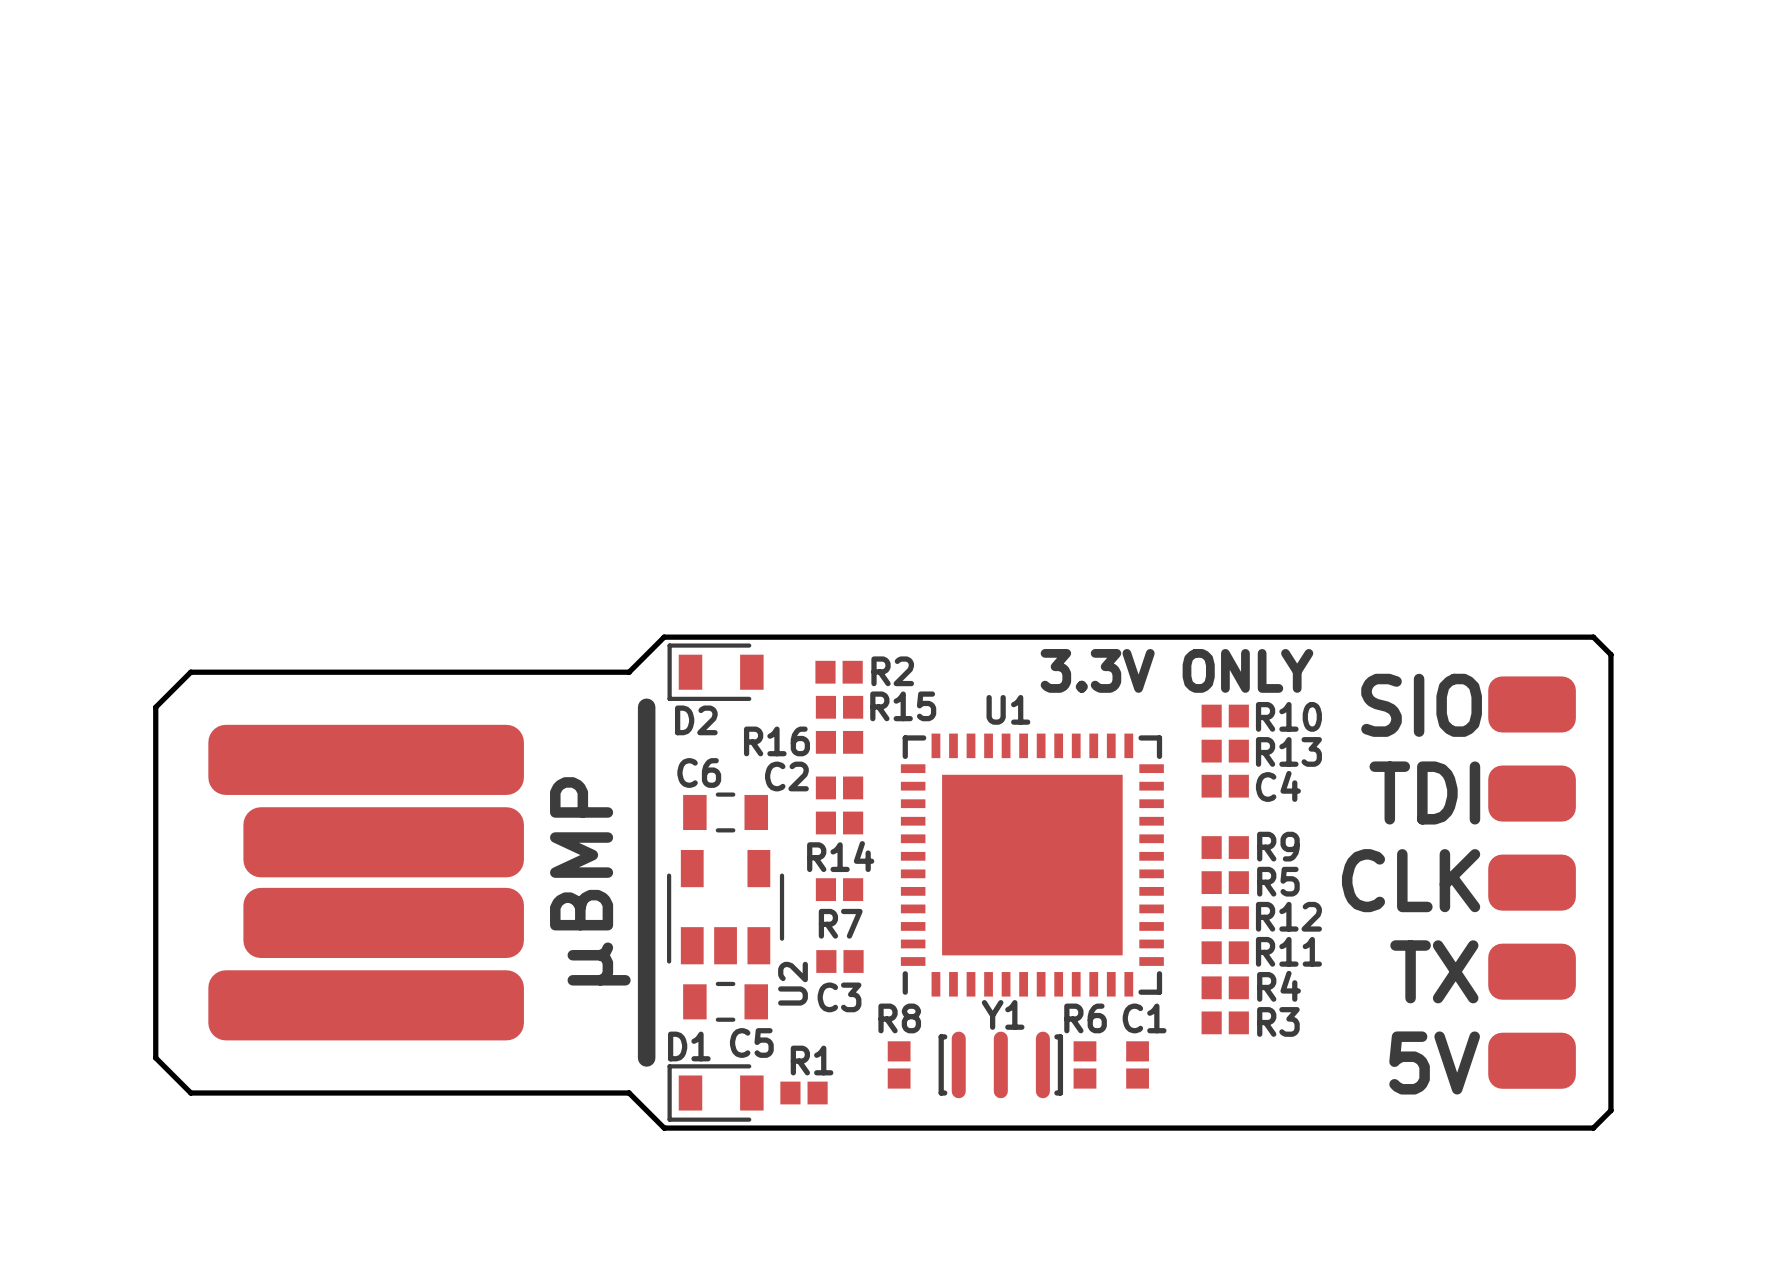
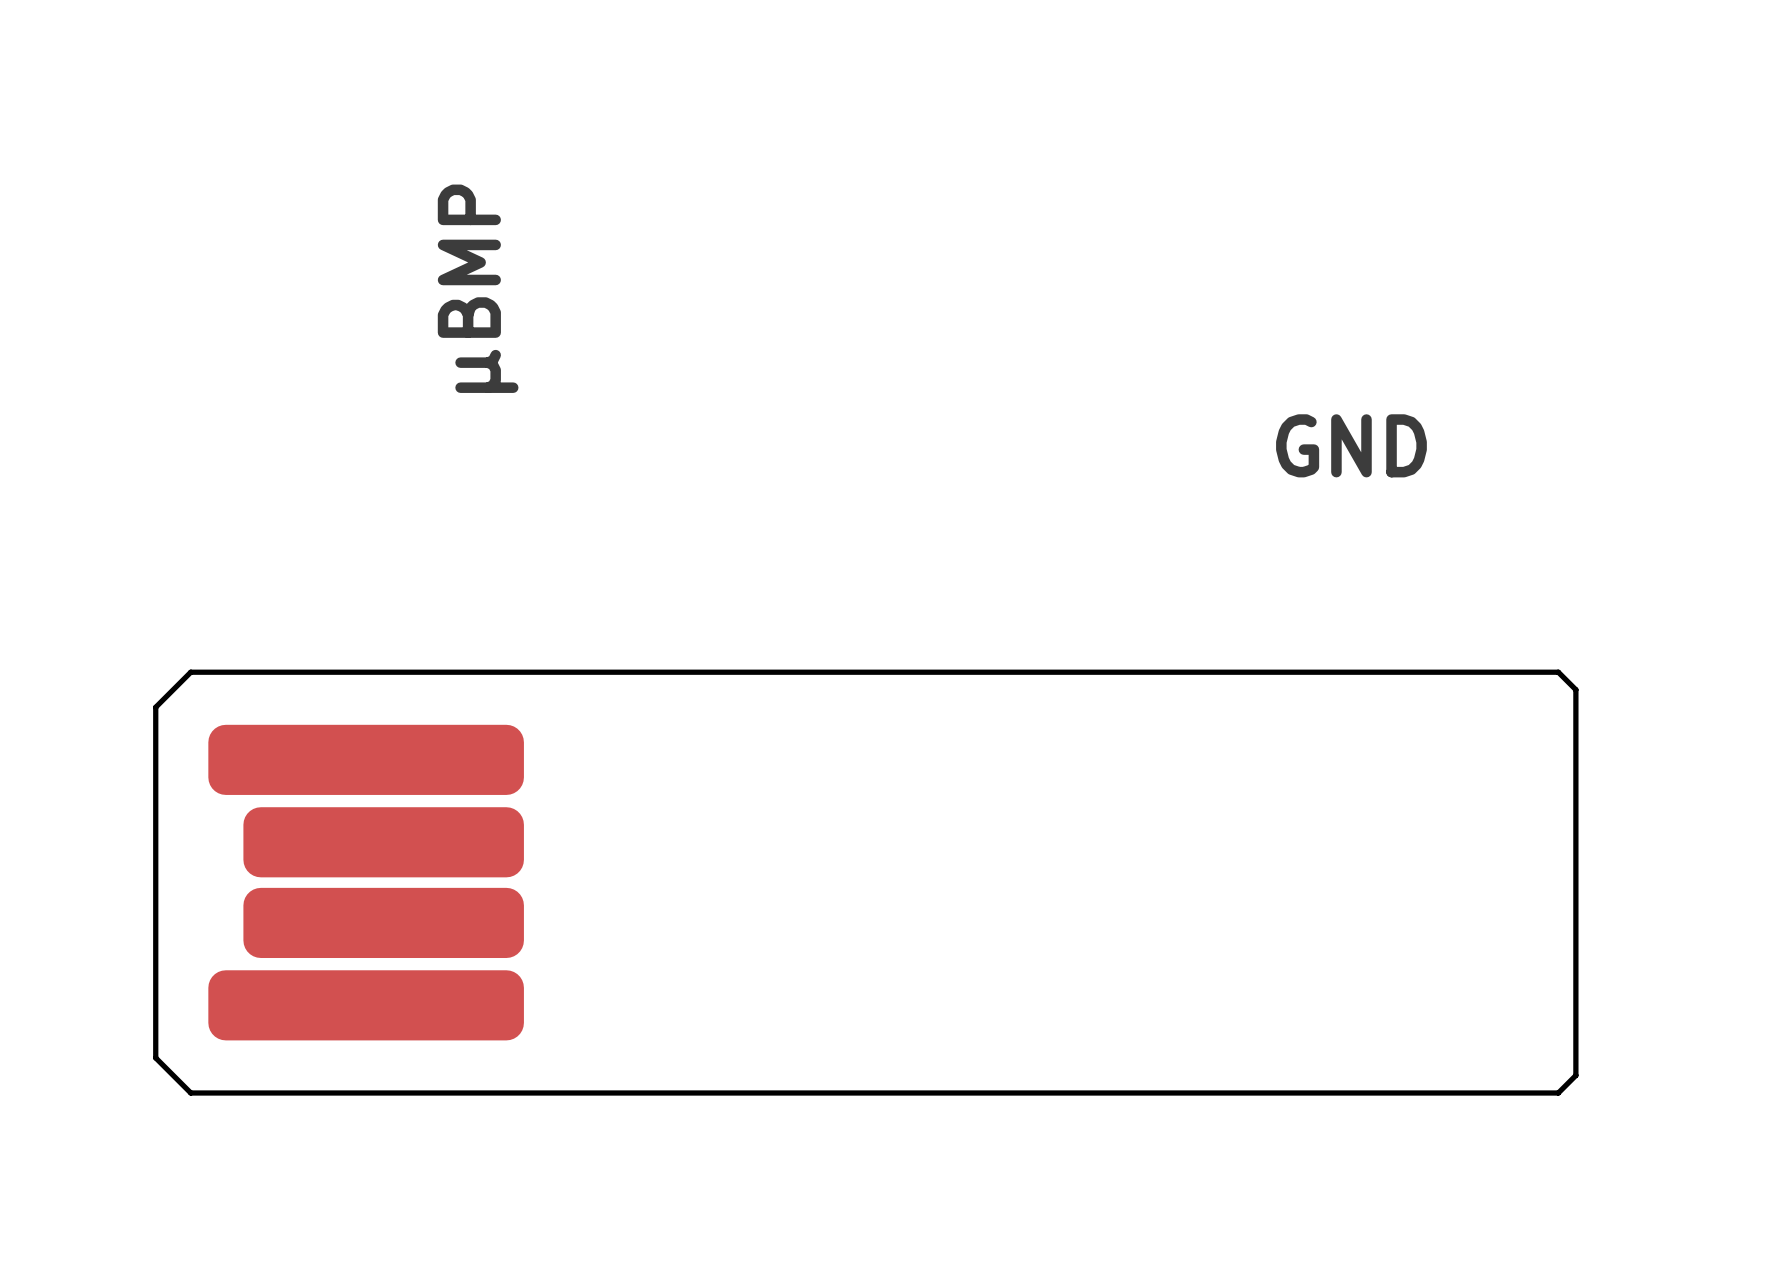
text: none -> GND (1351, 445)
text: 3.3V ONLY (1176, 670) -> none
board edge: (629, 672) (664, 637) (1593, 637) (1610, 654) (1610, 1110) (1593, 1128) (664, 1128) (629, 1093) -> (629, 672) (1558, 672) (1575, 689) (1575, 1075) (1558, 1093) (629, 1093)
D2: (715, 672) -> none
R2: (839, 672) -> none
text: SIO (1421, 705) -> none
line: (646, 707) (646, 1057) -> none
R15: (839, 707) -> none
R10: (1225, 716) -> none
R16: (839, 742) -> none
R13: (1225, 751) -> none
C4: (1225, 786) -> none
C2: (839, 787) -> none
text: TDI (1424, 792) -> none
C6: (725, 812) -> none
R14: (839, 823) -> none
R9: (1225, 847) -> none
U1: (1032, 865) -> none
text: CLK (1411, 880) -> none
text position: µBMP (590, 881) -> µBMP (478, 288)
R5: (1225, 882) -> none
part: (1532, 882) -> none
R7: (839, 889) -> none
U2: (725, 907) -> none
R12: (1225, 917) -> none
R11: (1225, 952) -> none
C3: (839, 961) -> none
text: TX (1434, 971) -> none
R4: (1225, 987) -> none
C5: (725, 1001) -> none
R3: (1225, 1022) -> none
text: 5V (1434, 1062) -> none
R8: (899, 1064) -> none
Y1: (1000, 1064) -> none
R6: (1084, 1064) -> none
C1: (1137, 1064) -> none
D1: (715, 1093) -> none
R1: (804, 1093) -> none

